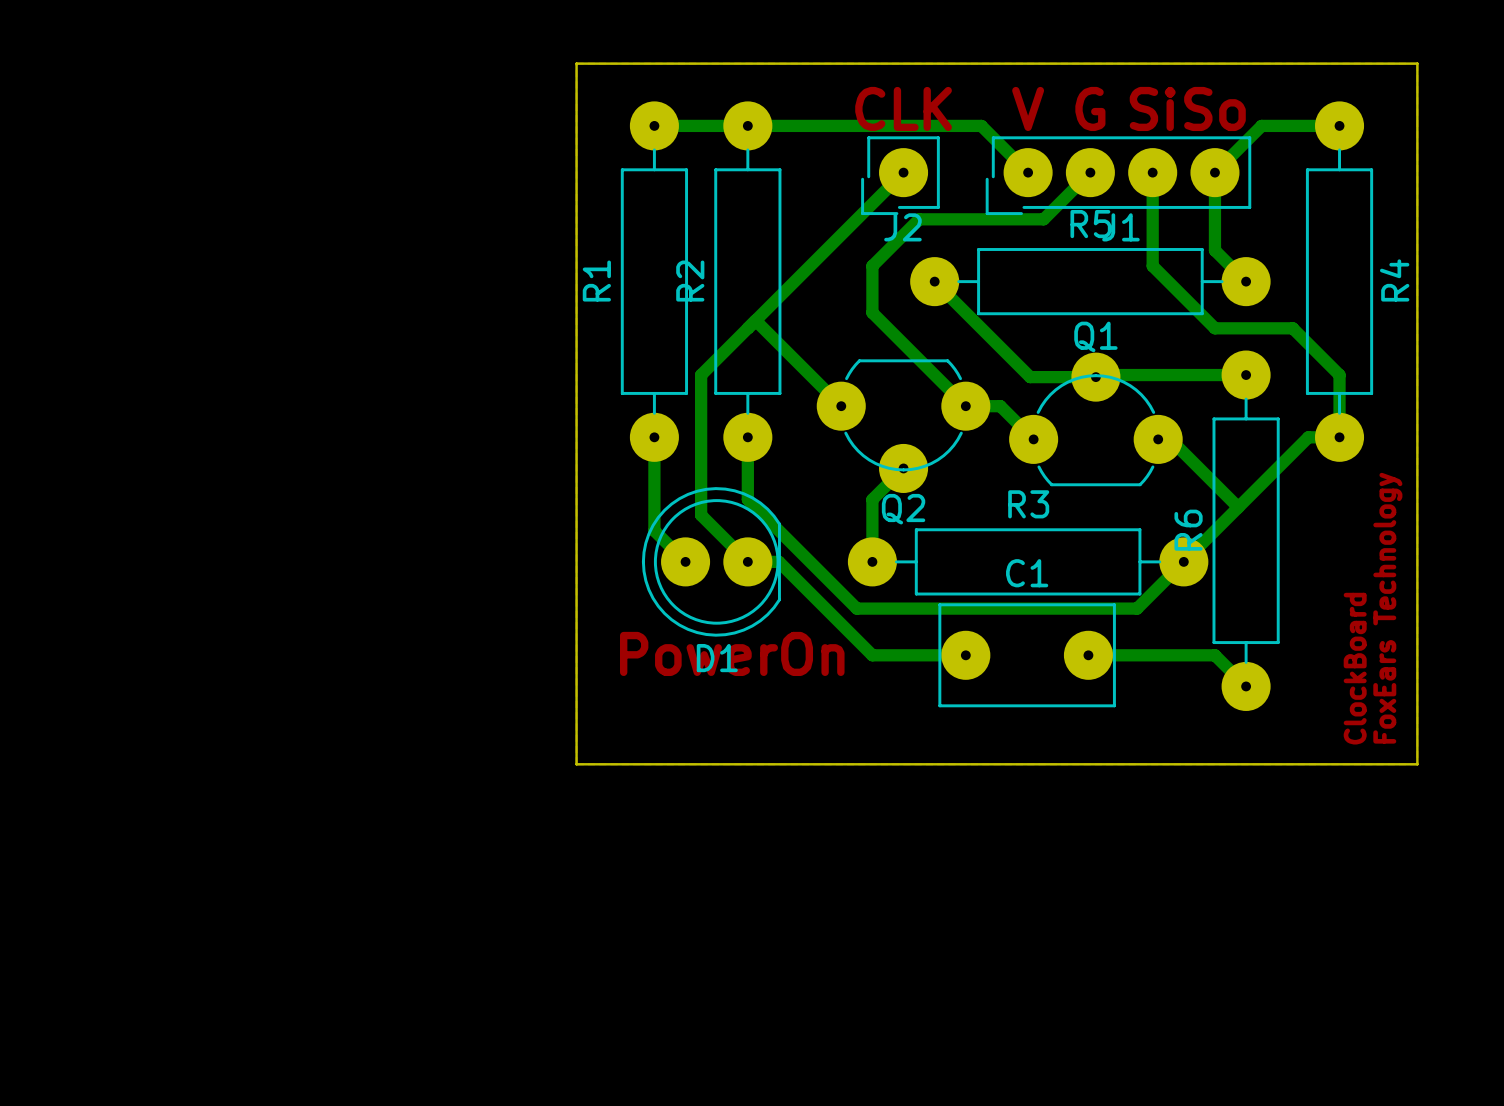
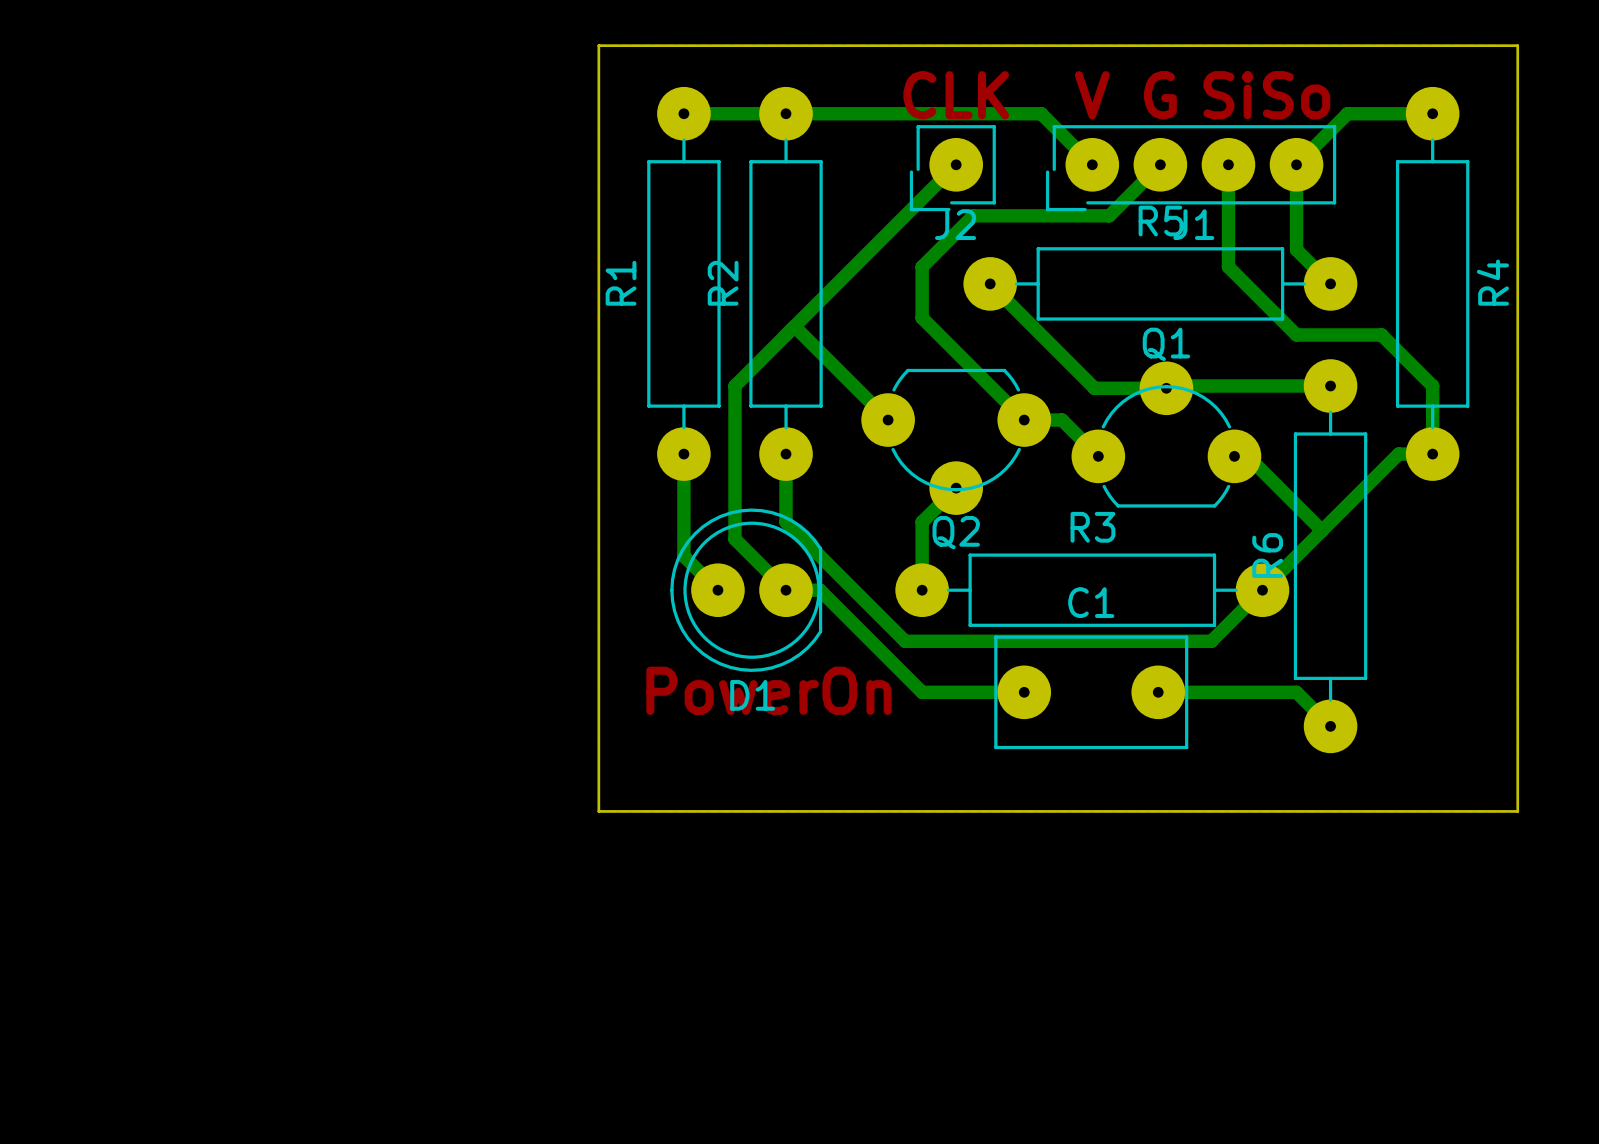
text: FoxEars Technology (1387, 608) -> none
text: ClockBoard (1355, 668) -> none

